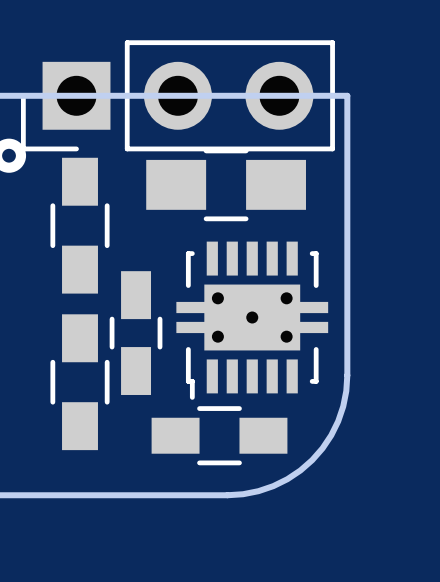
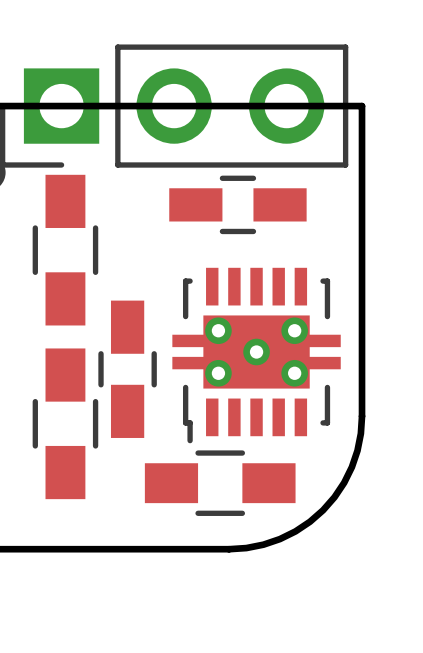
part footprint: [146, 148, 306, 222] -> [169, 175, 307, 235]

